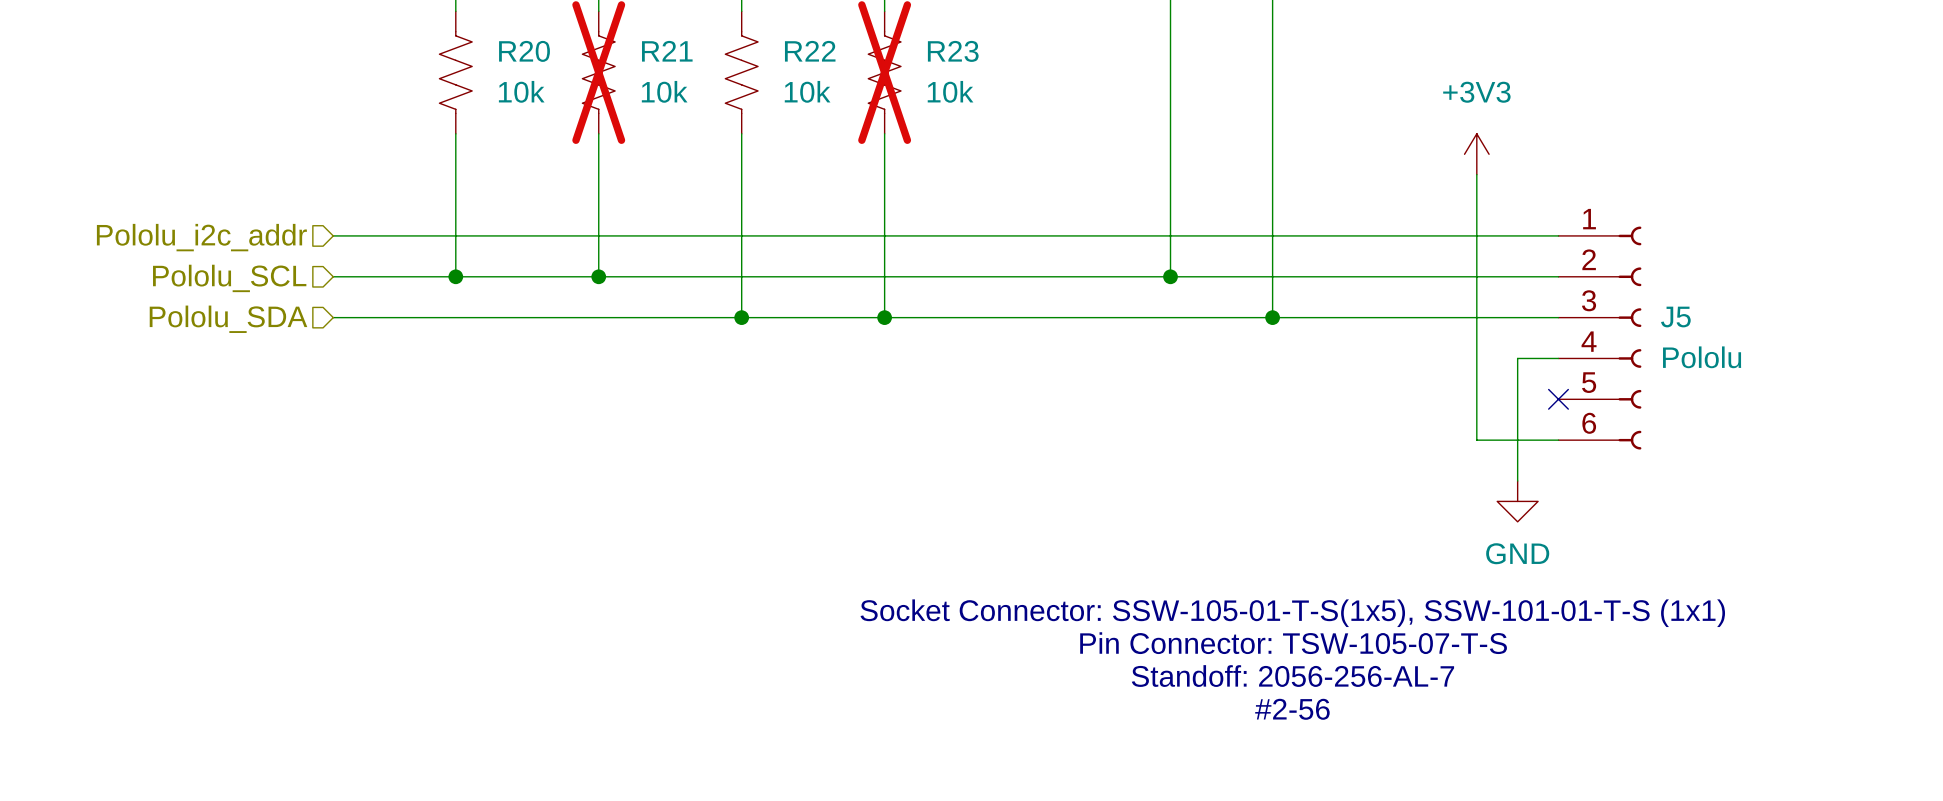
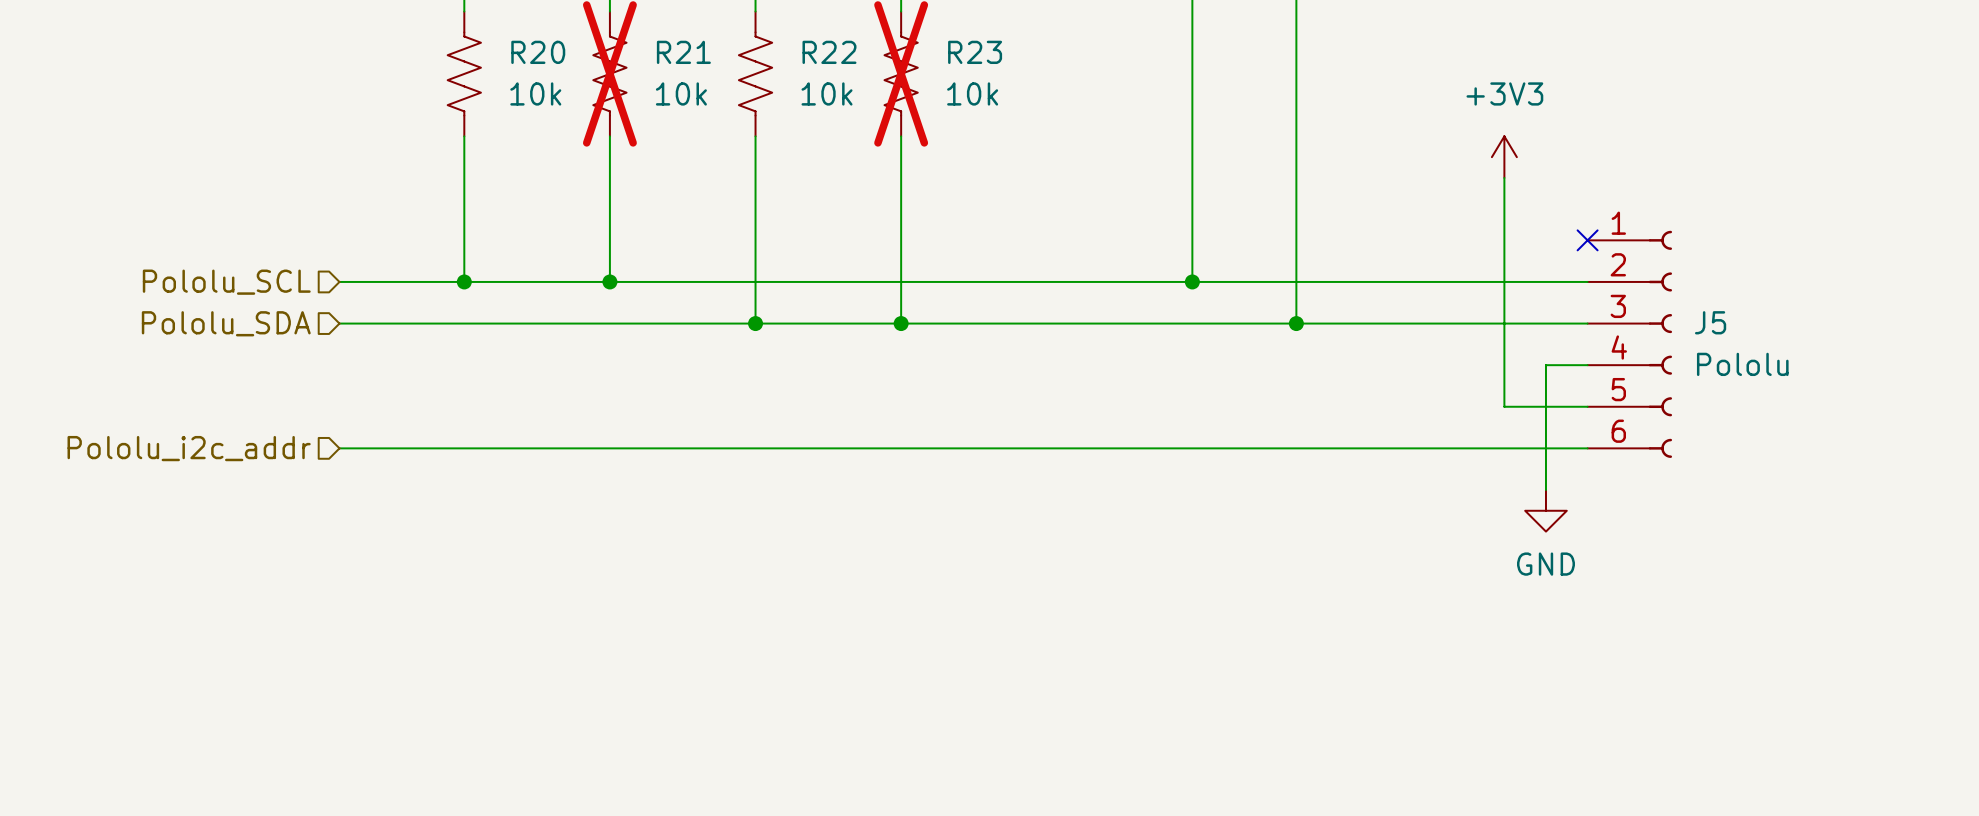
wire: (333, 235) (1558, 235) -> none
no-connect mark: none -> (1587, 240)
hierarchical label position: Pololu_i2c_addr (201, 237) -> Pololu_i2c_addr (189, 448)
wire: (1476, 399) (1476, 440) -> (1504, 406) (1587, 406)
no-connect mark: (1558, 399) -> none
wire: none -> (339, 448) (1504, 448)
text: Socket Connector: SSW-105-01-T-S(1x5), SSW-101-01-T-S (1x1) (1292, 613) -> none
text: Pin Connector: TSW-105-07-T-S (1293, 643) -> none
text: Standoff: 2056-256-AL-7 (1292, 676) -> none
text: #2-56 (1292, 709) -> none

